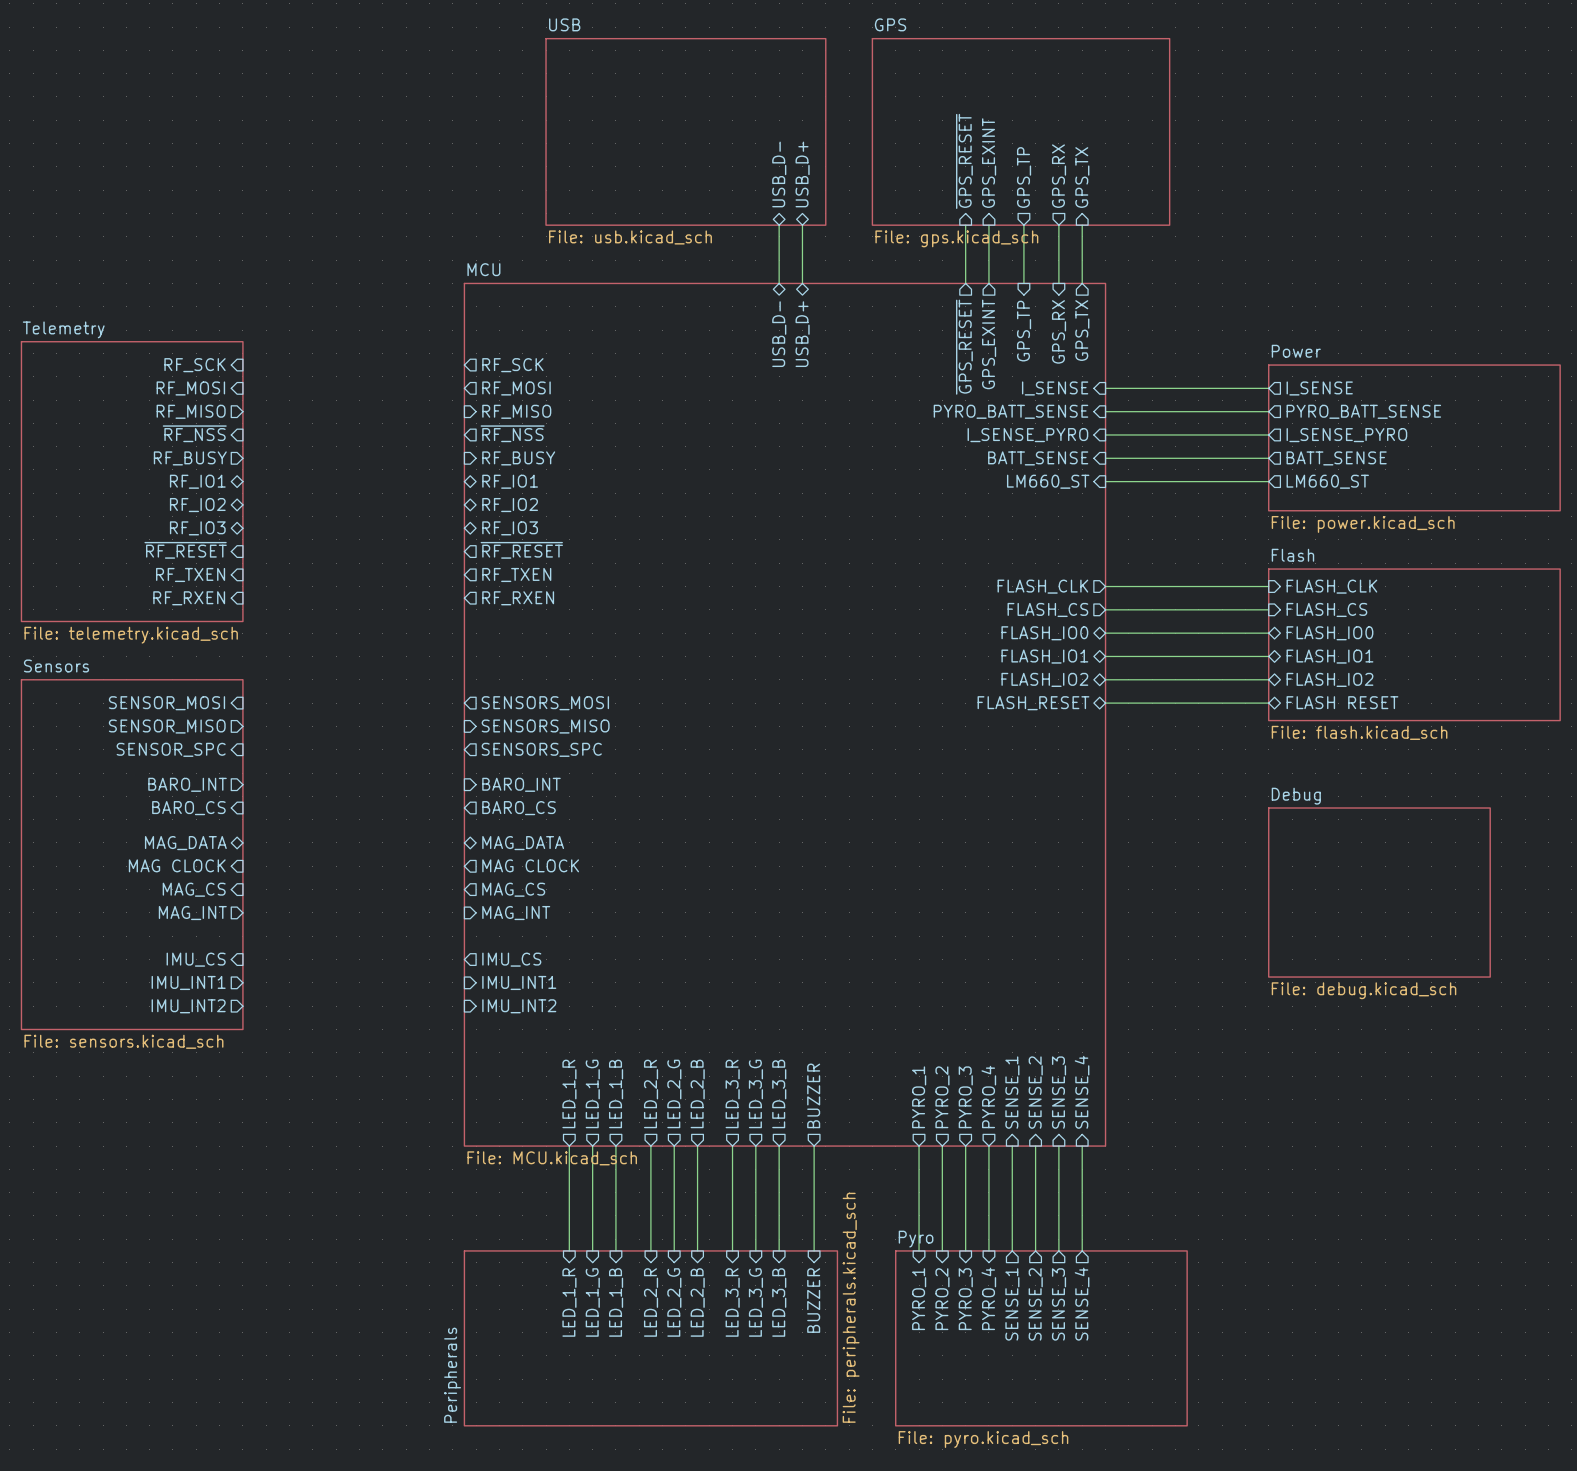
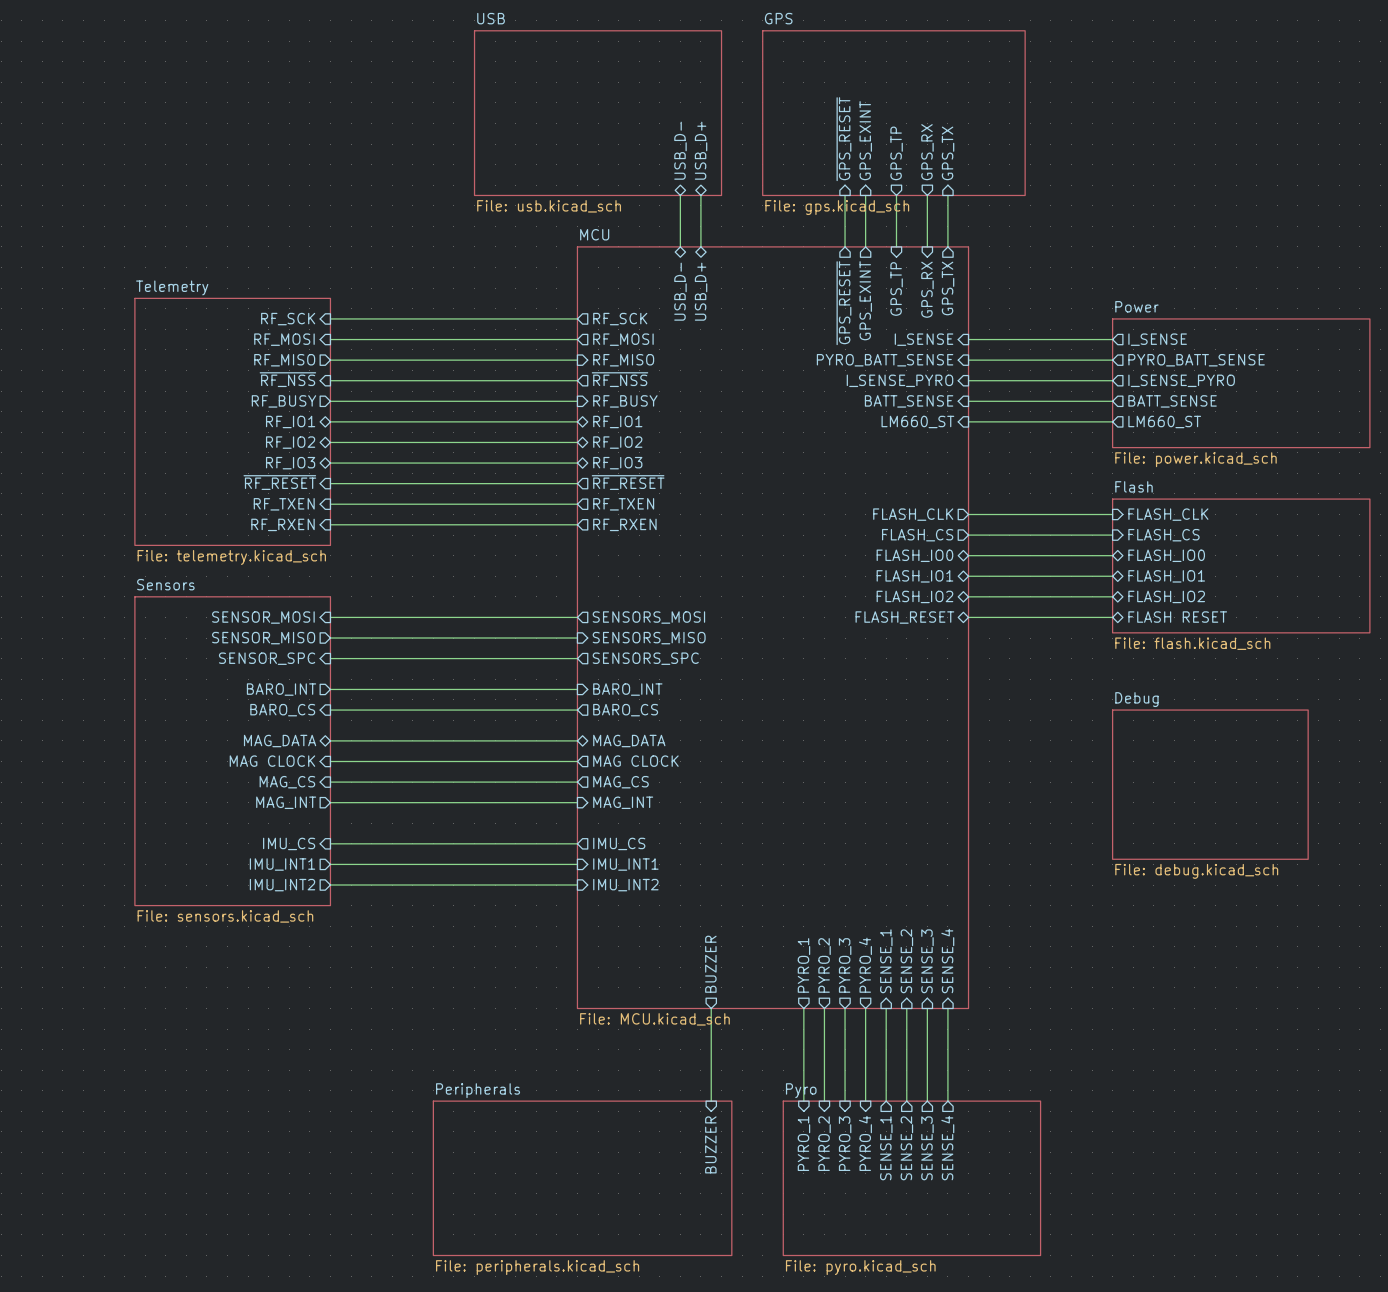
sheet pin: RF_SCK (195, 365) -> none
sheet pin: none -> RF_SCK (288, 319)
wire: none -> (330, 318) (577, 318)
sheet pin: RF_SCK (512, 365) -> none
sheet pin: none -> RF_SCK (620, 319)
sheet pin: RF_MOSI (190, 388) -> none
sheet pin: none -> RF_MOSI (284, 339)
wire: none -> (330, 339) (577, 339)
sheet pin: RF_MOSI (516, 388) -> none
sheet pin: none -> RF_MOSI (623, 339)
sheet pin: RF_MISO (191, 411) -> none
sheet pin: none -> RF_MISO (284, 360)
wire: none -> (330, 360) (577, 360)
sheet pin: RF_MISO (516, 411) -> none
sheet pin: none -> RF_MISO (623, 360)
sheet pin: ~{RF_NSS} (194, 433) -> none
sheet pin: none -> ~{RF_NSS} (287, 379)
sheet pin: ~{RF_NSS} (512, 433) -> none
sheet pin: none -> ~{RF_NSS} (620, 379)
wire: none -> (330, 380) (577, 380)
sheet pin: RF_BUSY (190, 458) -> none
sheet pin: none -> RF_BUSY (283, 401)
wire: none -> (330, 401) (577, 401)
sheet pin: RF_BUSY (518, 458) -> none
sheet pin: none -> RF_BUSY (625, 401)
sheet Telemetry position: (132, 481) -> (232, 421)
sheet pin: RF_IO1 (197, 481) -> none
sheet pin: none -> RF_IO1 (290, 421)
wire: none -> (330, 421) (577, 421)
sheet pin: RF_IO1 (510, 481) -> none
sheet pin: none -> RF_IO1 (617, 421)
wire: none -> (330, 442) (577, 442)
sheet pin: RF_IO2 (197, 505) -> none
sheet pin: none -> RF_IO2 (290, 442)
sheet pin: RF_IO2 (510, 505) -> none
sheet pin: none -> RF_IO2 (617, 442)
sheet pin: RF_IO3 (197, 528) -> none
sheet pin: none -> RF_IO3 (290, 463)
wire: none -> (330, 463) (577, 463)
sheet pin: RF_IO3 (510, 528) -> none
sheet pin: none -> RF_IO3 (617, 463)
sheet pin: ~{RF_RESET} (185, 550) -> none
sheet pin: none -> ~{RF_RESET} (279, 482)
sheet pin: ~{RF_RESET} (521, 550) -> none
sheet pin: none -> ~{RF_RESET} (628, 482)
wire: none -> (330, 483) (577, 483)
sheet pin: RF_TXEN (190, 574) -> none
sheet pin: none -> RF_TXEN (284, 504)
wire: none -> (330, 504) (577, 504)
sheet pin: RF_TXEN (516, 574) -> none
sheet pin: none -> RF_TXEN (623, 504)
sheet pin: RF_RXEN (189, 598) -> none
sheet pin: none -> RF_RXEN (283, 524)
wire: none -> (330, 524) (577, 524)
sheet pin: RF_RXEN (518, 598) -> none
sheet pin: none -> RF_RXEN (624, 524)
sheet pin position: SENSOR_MOSI (166, 703) -> SENSOR_MOSI (263, 617)
wire: none -> (330, 617) (577, 617)
sheet pin position: SENSORS_MOSI (545, 703) -> SENSORS_MOSI (648, 617)
sheet MCU: File: MCU.kicad_sch (784, 714) -> none
sheet MCU: none -> File: MCU.kicad_sch (772, 627)
sheet pin position: SENSOR_MISO (167, 726) -> SENSOR_MISO (263, 638)
wire: none -> (330, 638) (577, 638)
sheet pin position: SENSORS_MISO (545, 726) -> SENSORS_MISO (649, 638)
sheet pin position: SENSOR_SPC (171, 749) -> SENSOR_SPC (267, 658)
wire: none -> (330, 658) (577, 658)
sheet pin position: SENSORS_SPC (541, 749) -> SENSORS_SPC (645, 658)
sheet pin: BARO_INT (187, 784) -> none
sheet pin: none -> BARO_INT (281, 689)
wire: none -> (330, 689) (577, 689)
sheet pin: BARO_INT (521, 784) -> none
sheet pin: none -> BARO_INT (627, 689)
sheet pin: BARO_CS (188, 808) -> none
sheet pin: none -> BARO_CS (282, 710)
wire: none -> (330, 710) (577, 710)
sheet pin: BARO_CS (518, 808) -> none
sheet pin: none -> BARO_CS (625, 710)
wire: none -> (330, 740) (577, 740)
sheet pin: MAG_DATA (185, 843) -> none
sheet pin: none -> MAG_DATA (280, 741)
sheet pin: MAG_DATA (523, 843) -> none
sheet pin: none -> MAG_DATA (629, 741)
sheet Sensors position: (132, 854) -> (232, 751)
sheet pin: MAG CLOCK (177, 865) -> none
sheet pin: none -> MAG CLOCK (272, 761)
sheet pin: MAG CLOCK (530, 865) -> none
sheet pin: none -> MAG CLOCK (635, 761)
wire: none -> (330, 761) (577, 761)
sheet pin: MAG_CS (194, 889) -> none
sheet pin: none -> MAG_CS (287, 782)
wire: none -> (330, 782) (577, 782)
sheet pin: MAG_CS (513, 889) -> none
sheet pin: none -> MAG_CS (620, 782)
wire: none -> (330, 802) (577, 802)
sheet pin: MAG_INT (192, 913) -> none
sheet pin: none -> MAG_INT (286, 802)
sheet pin: MAG_INT (516, 913) -> none
sheet pin: none -> MAG_INT (623, 802)
sheet pin: IMU_CS (196, 959) -> none
sheet pin: none -> IMU_CS (289, 843)
wire: none -> (330, 843) (577, 843)
sheet pin: IMU_CS (511, 959) -> none
sheet pin: none -> IMU_CS (619, 843)
sheet pin: IMU_INT1 (188, 982) -> none
sheet pin: none -> IMU_INT1 (282, 864)
wire: none -> (330, 864) (577, 864)
sheet pin: IMU_INT1 (519, 982) -> none
sheet pin: none -> IMU_INT1 (625, 864)
sheet pin: IMU_INT2 (188, 1006) -> none
sheet pin: none -> IMU_INT2 (282, 885)
wire: none -> (330, 885) (577, 885)
sheet pin: IMU_INT2 (519, 1006) -> none
sheet pin: none -> IMU_INT2 (625, 885)
sheet pin: LED_1_R (569, 1093) -> none
sheet pin: LED_1_G (592, 1093) -> none
sheet pin: LED_1_B (616, 1093) -> none
sheet pin: LED_2_R (651, 1093) -> none
sheet pin: LED_2_G (674, 1093) -> none
sheet pin: LED_2_B (697, 1093) -> none
sheet pin: LED_3_R (732, 1093) -> none
sheet pin: LED_3_G (755, 1093) -> none
sheet pin: LED_3_B (779, 1093) -> none
wire: (569, 1146) (569, 1250) -> none
wire: (592, 1146) (592, 1250) -> none
wire: (615, 1146) (615, 1250) -> none
wire: (650, 1146) (650, 1250) -> none
wire: (674, 1146) (674, 1250) -> none
wire: (697, 1146) (697, 1250) -> none
wire: (732, 1146) (732, 1250) -> none
wire: (755, 1146) (755, 1250) -> none
wire: (779, 1146) (779, 1250) -> none
sheet pin: LED_1_R (569, 1302) -> none
sheet pin: LED_1_G (592, 1302) -> none
sheet pin: LED_1_B (616, 1302) -> none
sheet pin: LED_2_R (651, 1302) -> none
sheet pin: LED_2_G (674, 1302) -> none
sheet pin: LED_2_B (697, 1302) -> none
sheet pin: LED_3_R (732, 1302) -> none
sheet pin: LED_3_G (755, 1302) -> none
sheet pin: LED_3_B (779, 1302) -> none
sheet Peripherals: File: peripherals.kicad_sch (650, 1338) -> none
sheet Peripherals: none -> File: peripherals.kicad_sch (582, 1178)

